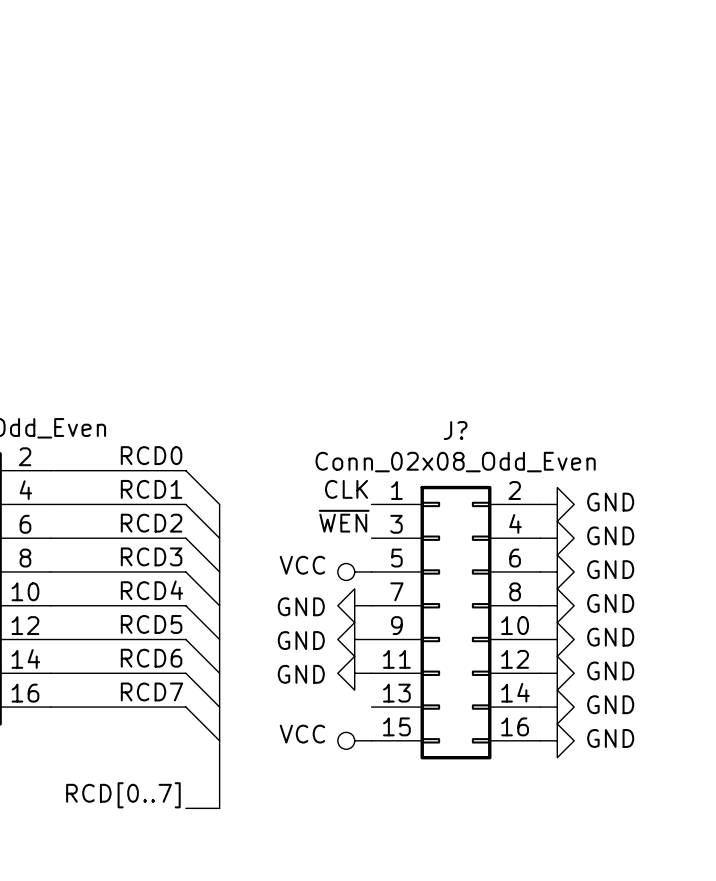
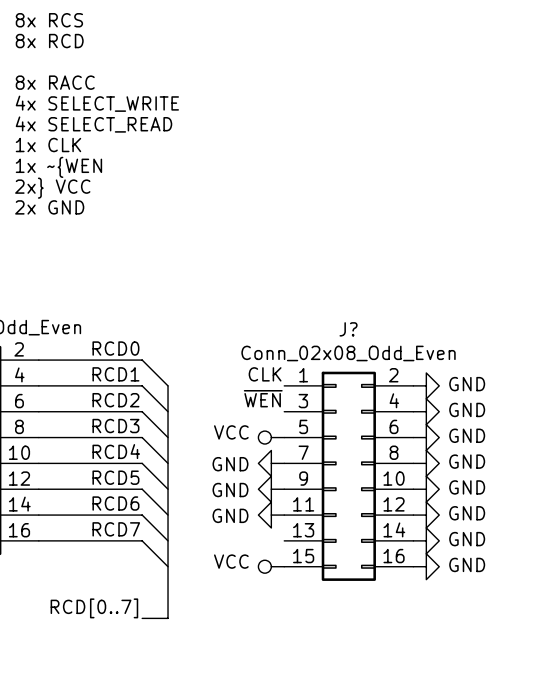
text: none -> 8x RCS (49, 20)
text: none -> 8x RCD (49, 41)
text: none -> 8x RACC (55, 82)
text: none -> 4x SELECT_WRITE (97, 103)
text: none -> 4x SELECT_READ (93, 124)
text: none -> 1x CLK (48, 145)
text: none -> 1x ~{WEN (58, 167)
text: none -> 2x} VCC (52, 188)
text: none -> 2x GND (49, 207)

